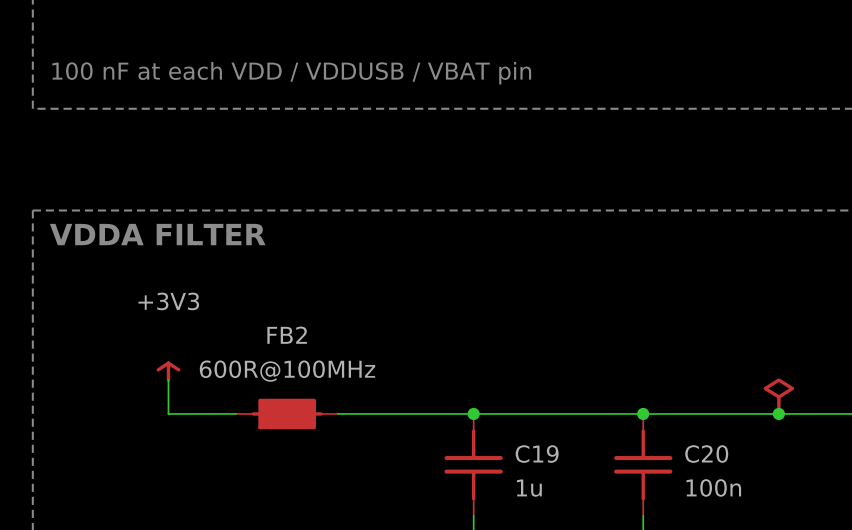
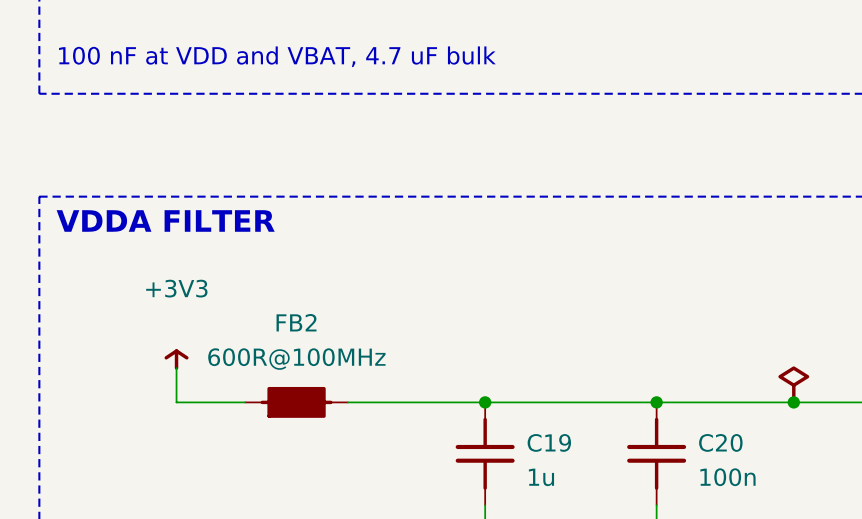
text: 100 nF at each VDD / VDDUSB / VBAT pin (291, 73) -> 100 nF at VDD and VBAT, 4.7 uF bulk (277, 56)

